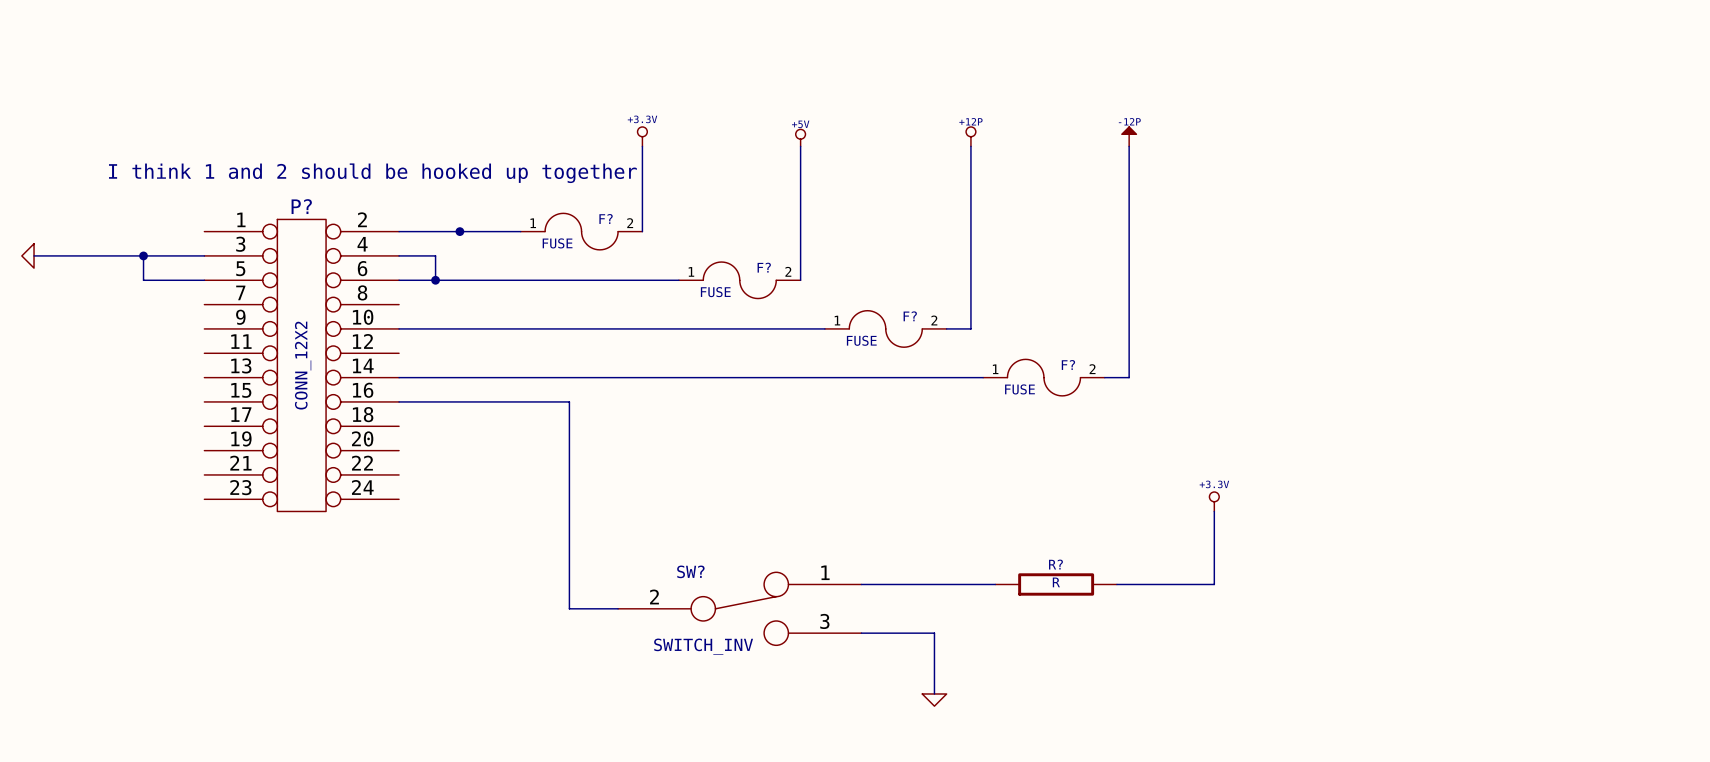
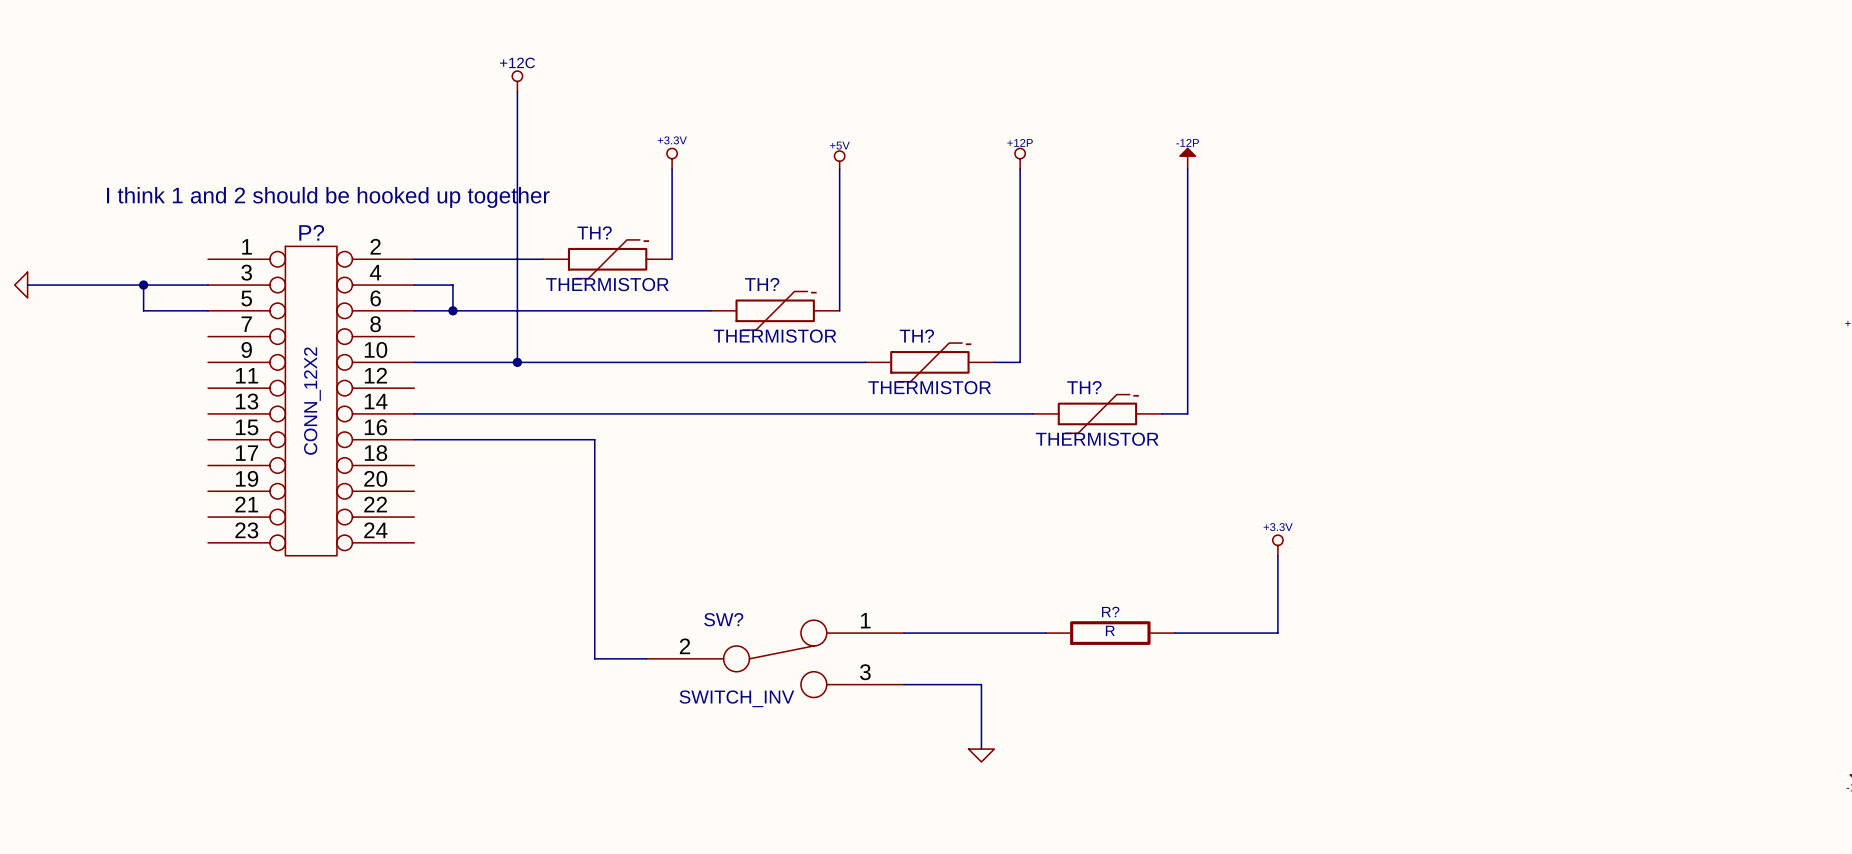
power symbol: none -> +12C (517, 81)
wire: none -> (517, 91) (517, 362)
junction: (459, 231) -> none
F?: FUSE (581, 231) -> none
TH?: none -> THERMISTOR (607, 259)
F?: FUSE (739, 280) -> none
TH?: none -> THERMISTOR (775, 310)
junction: none -> (517, 362)
F?: FUSE (885, 328) -> none
TH?: none -> THERMISTOR (929, 362)
F?: FUSE (1043, 377) -> none
TH?: none -> THERMISTOR (1097, 413)

